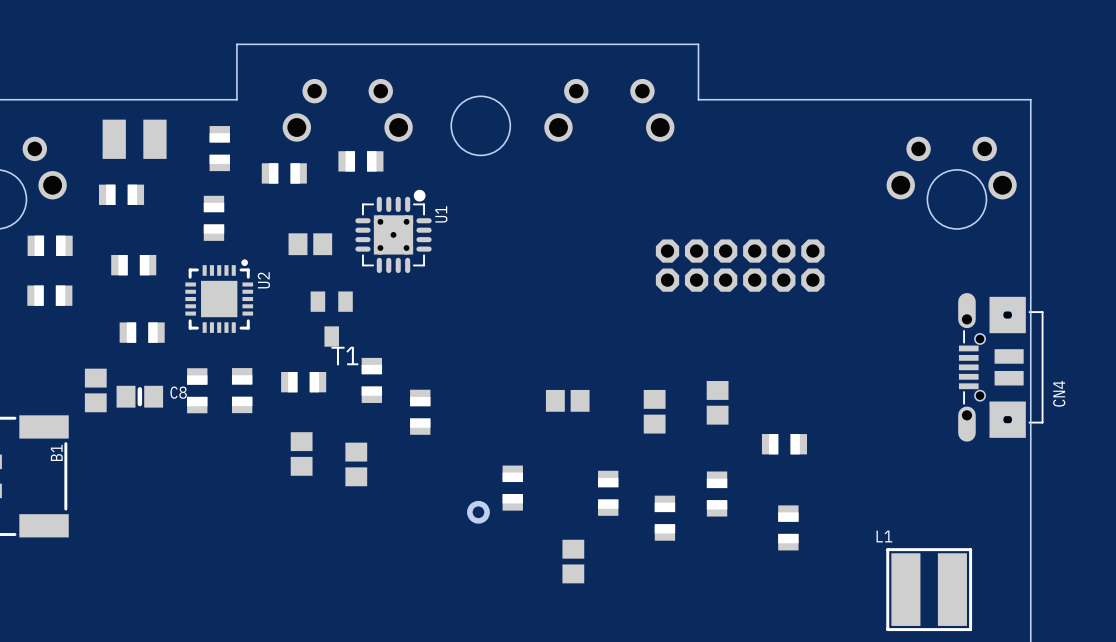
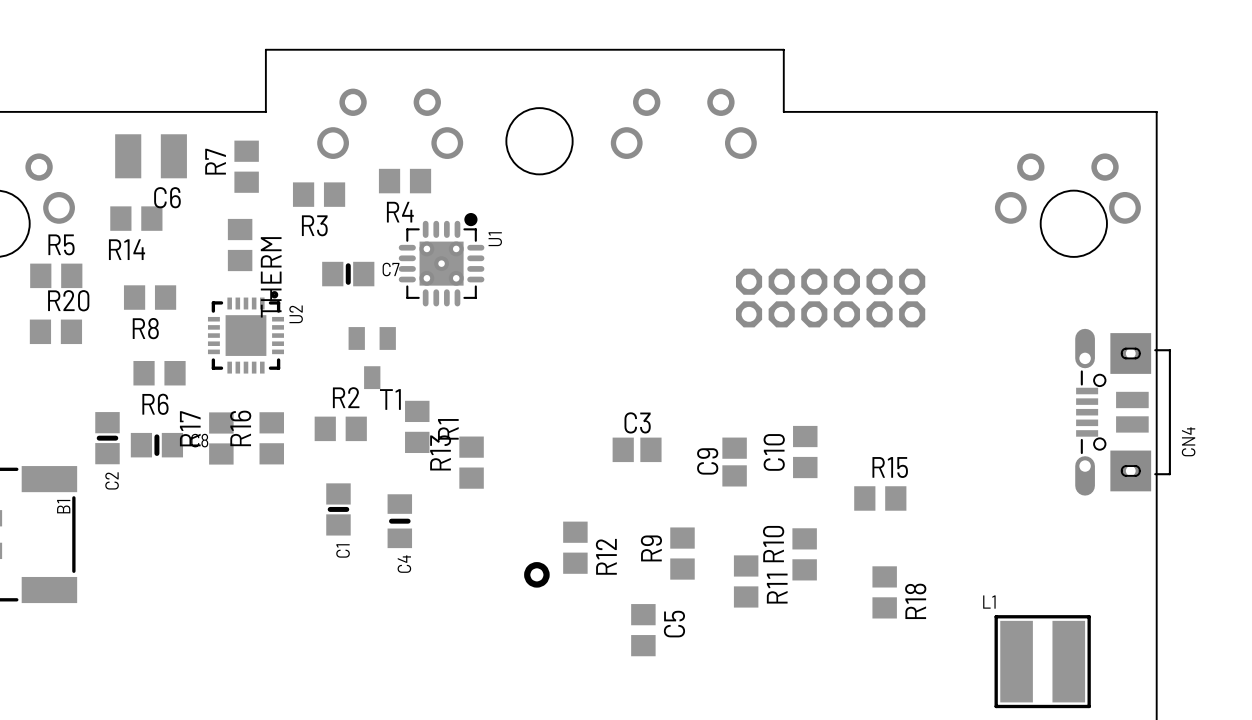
part: (219, 148) -> none
R7: none -> (246, 166)
part: (360, 161) -> none
R4: none -> (405, 181)
part: (284, 173) -> none
R3: none -> (319, 194)
C6 name: none -> C6 (167, 197)
part: (121, 194) -> none
R14: none -> (136, 218)
part: (213, 218) -> none
THERM: none -> (240, 245)
part: (310, 244) -> none
C7: none -> (348, 274)
part: (50, 245) -> none
R5: none -> (56, 275)
part: (133, 265) -> none
R8: none -> (150, 297)
part: (49, 295) -> none
R20: none -> (55, 331)
part: (142, 332) -> none
R6: none -> (159, 373)
C3 name: none -> C3 (637, 422)
part: (371, 380) -> none
R1: none -> (417, 426)
part: (303, 382) -> none
R2: none -> (340, 428)
part: (95, 390) -> none
C2: none -> (107, 438)
part: (197, 390) -> none
R17: none -> (221, 438)
part: (242, 390) -> none
R16: none -> (271, 438)
part: (717, 402) -> none
C10: none -> (805, 452)
C9 name: none -> C9 (707, 461)
part: (420, 412) -> none
R13: none -> (471, 462)
part: (784, 444) -> none
R15: none -> (880, 498)
part: (301, 453) -> none
C1: none -> (338, 509)
part: (356, 464) -> none
C4: none -> (399, 521)
part: (512, 488) -> none
R12: none -> (575, 547)
part: (608, 493) -> none
R9: none -> (682, 553)
part: (717, 494) -> none
R10: none -> (804, 554)
part: (664, 518) -> none
R11: none -> (746, 581)
part: (788, 527) -> none
R18: none -> (884, 592)
part: (573, 561) -> none
C5: none -> (643, 630)

